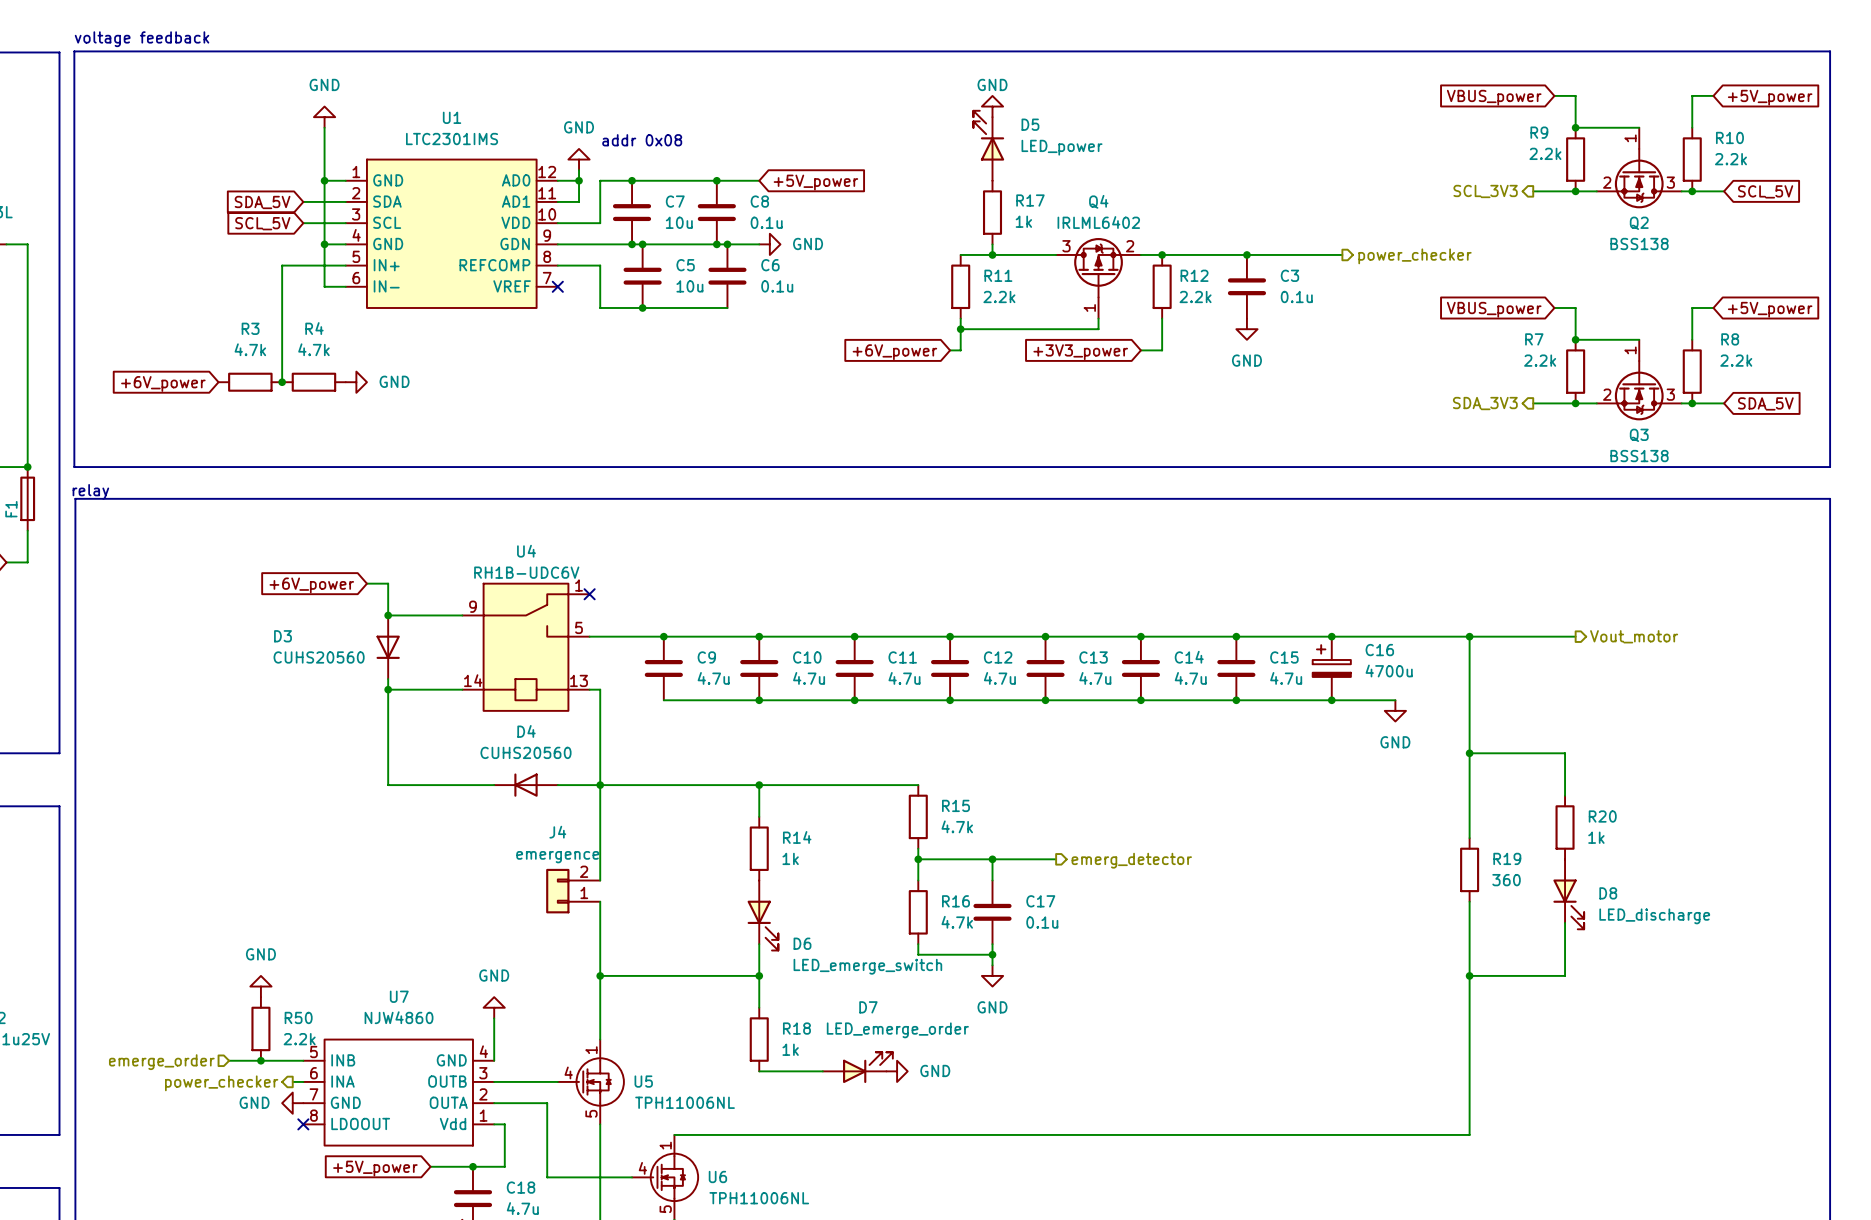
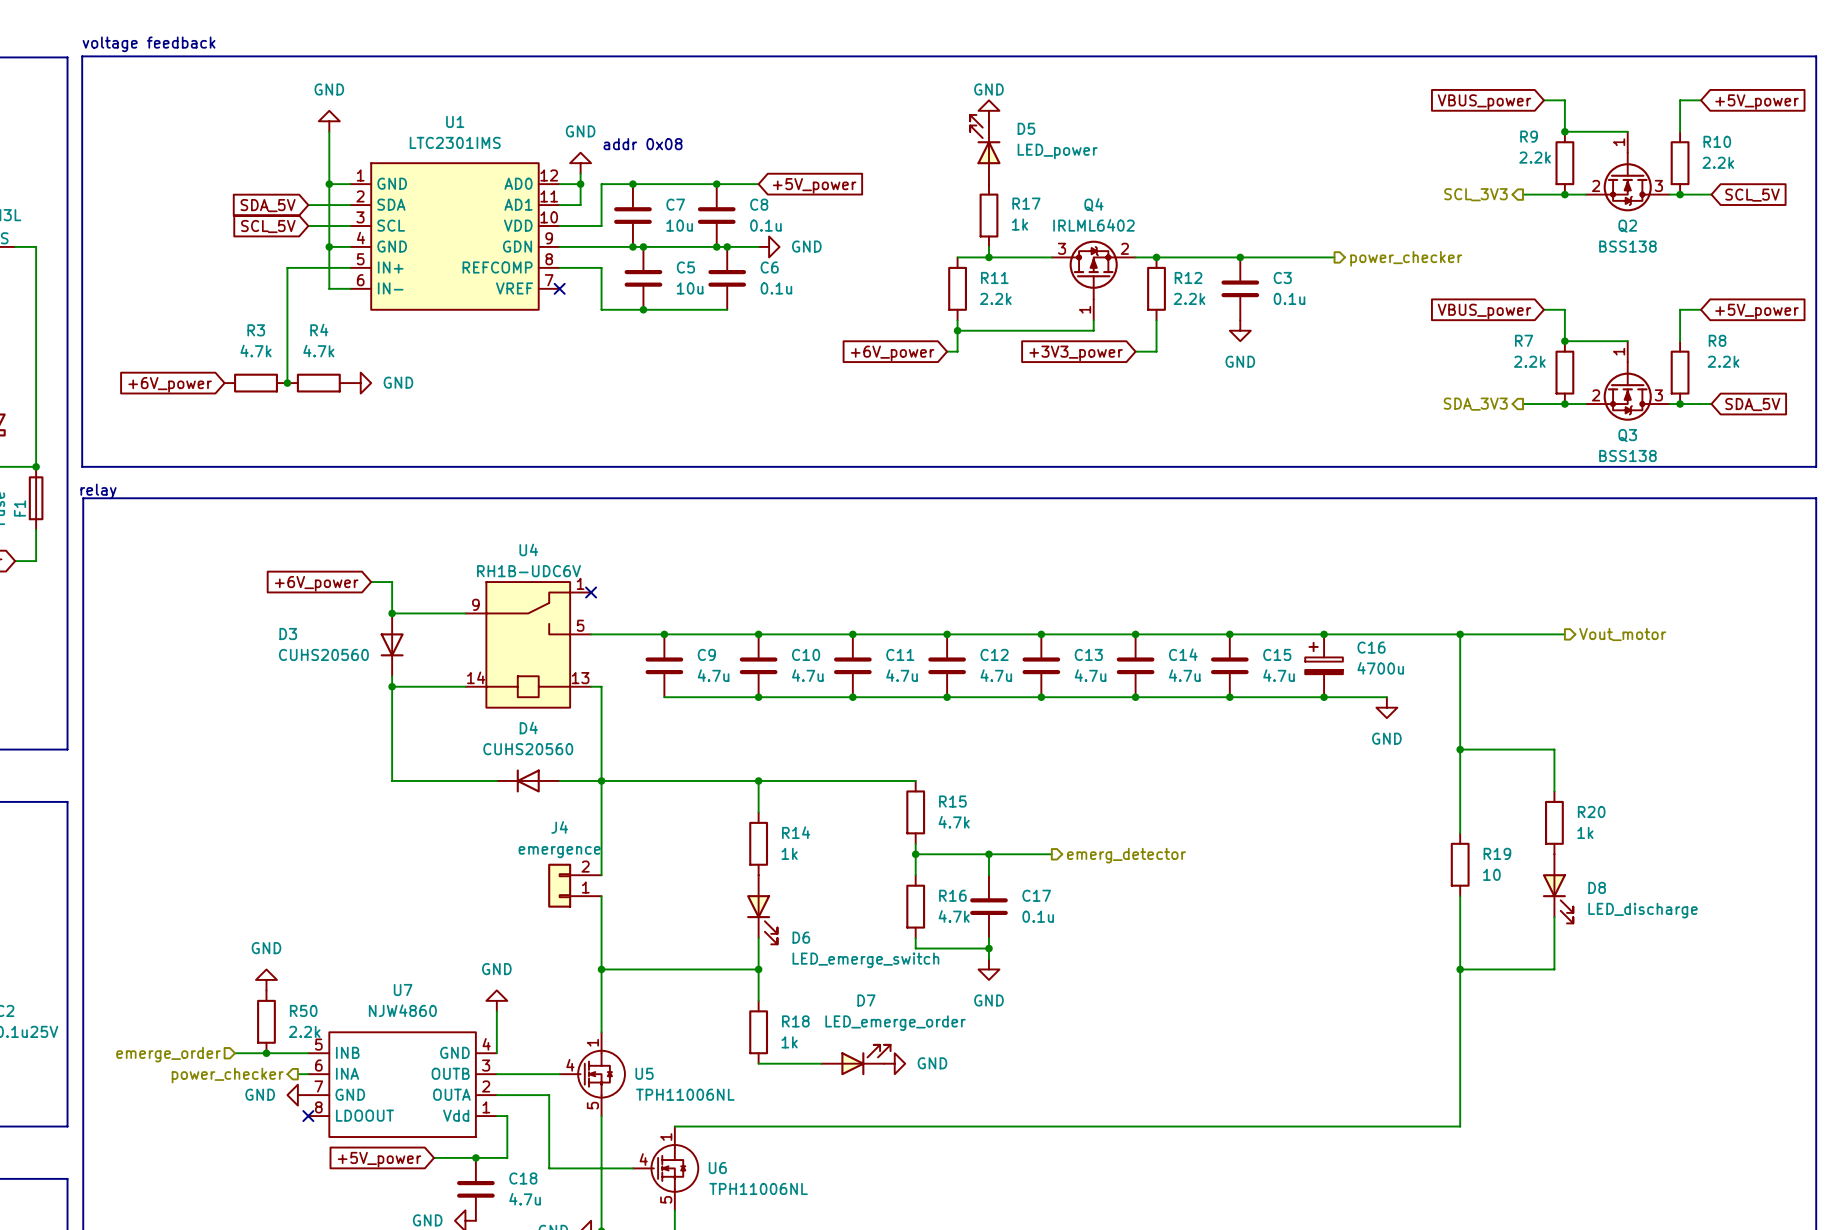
R19 value: 360 (1506, 880) -> 10 (1491, 874)

